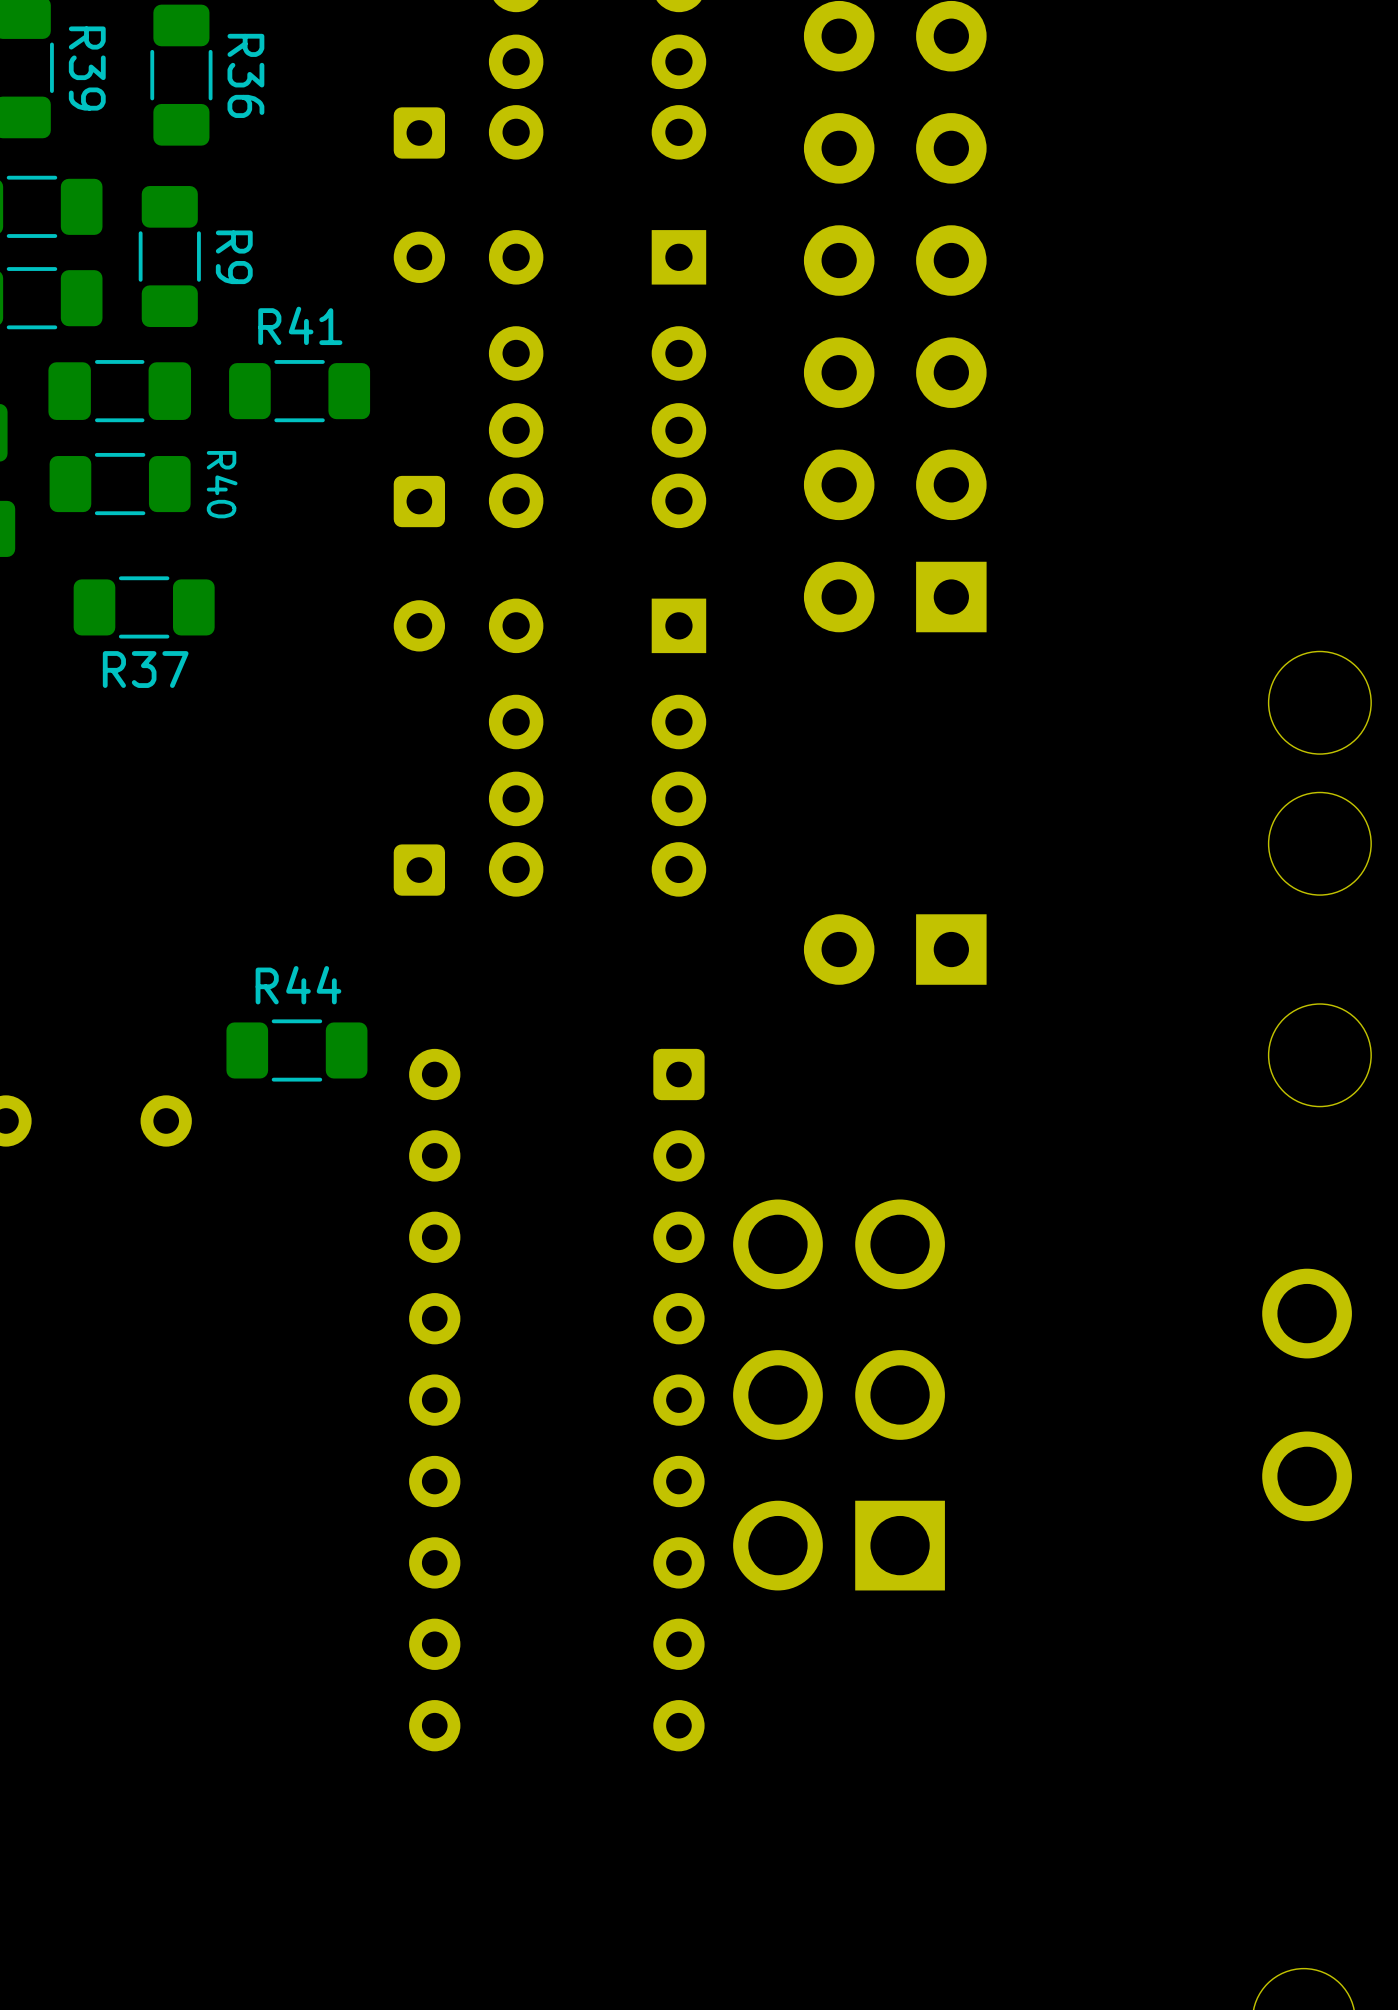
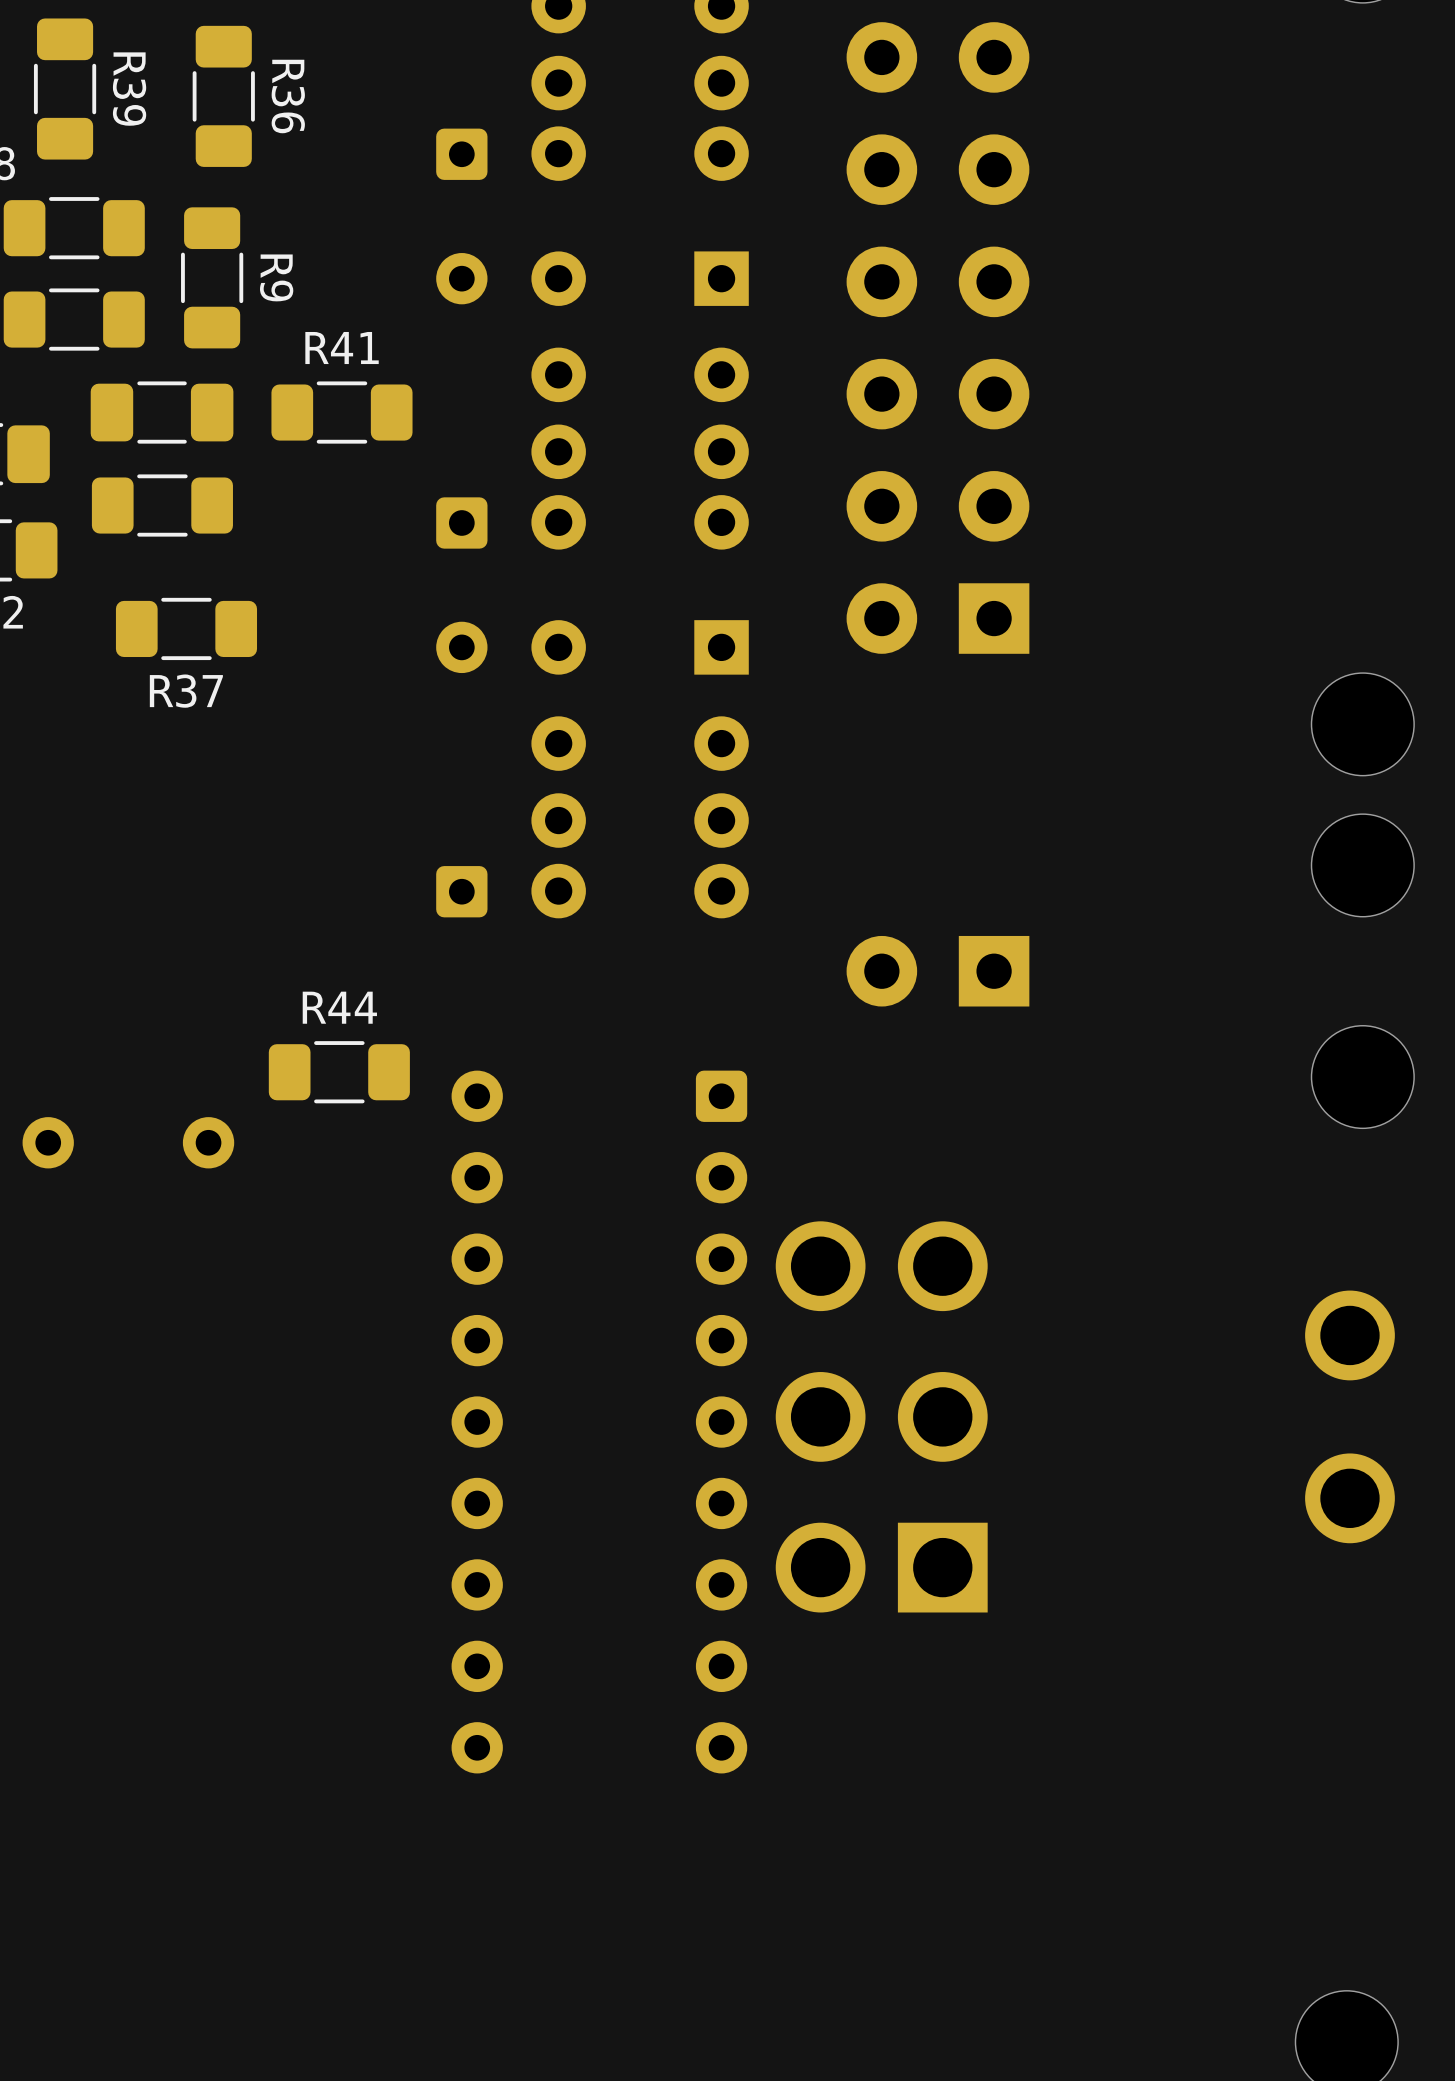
R40 name: R40 (222, 484) -> none

